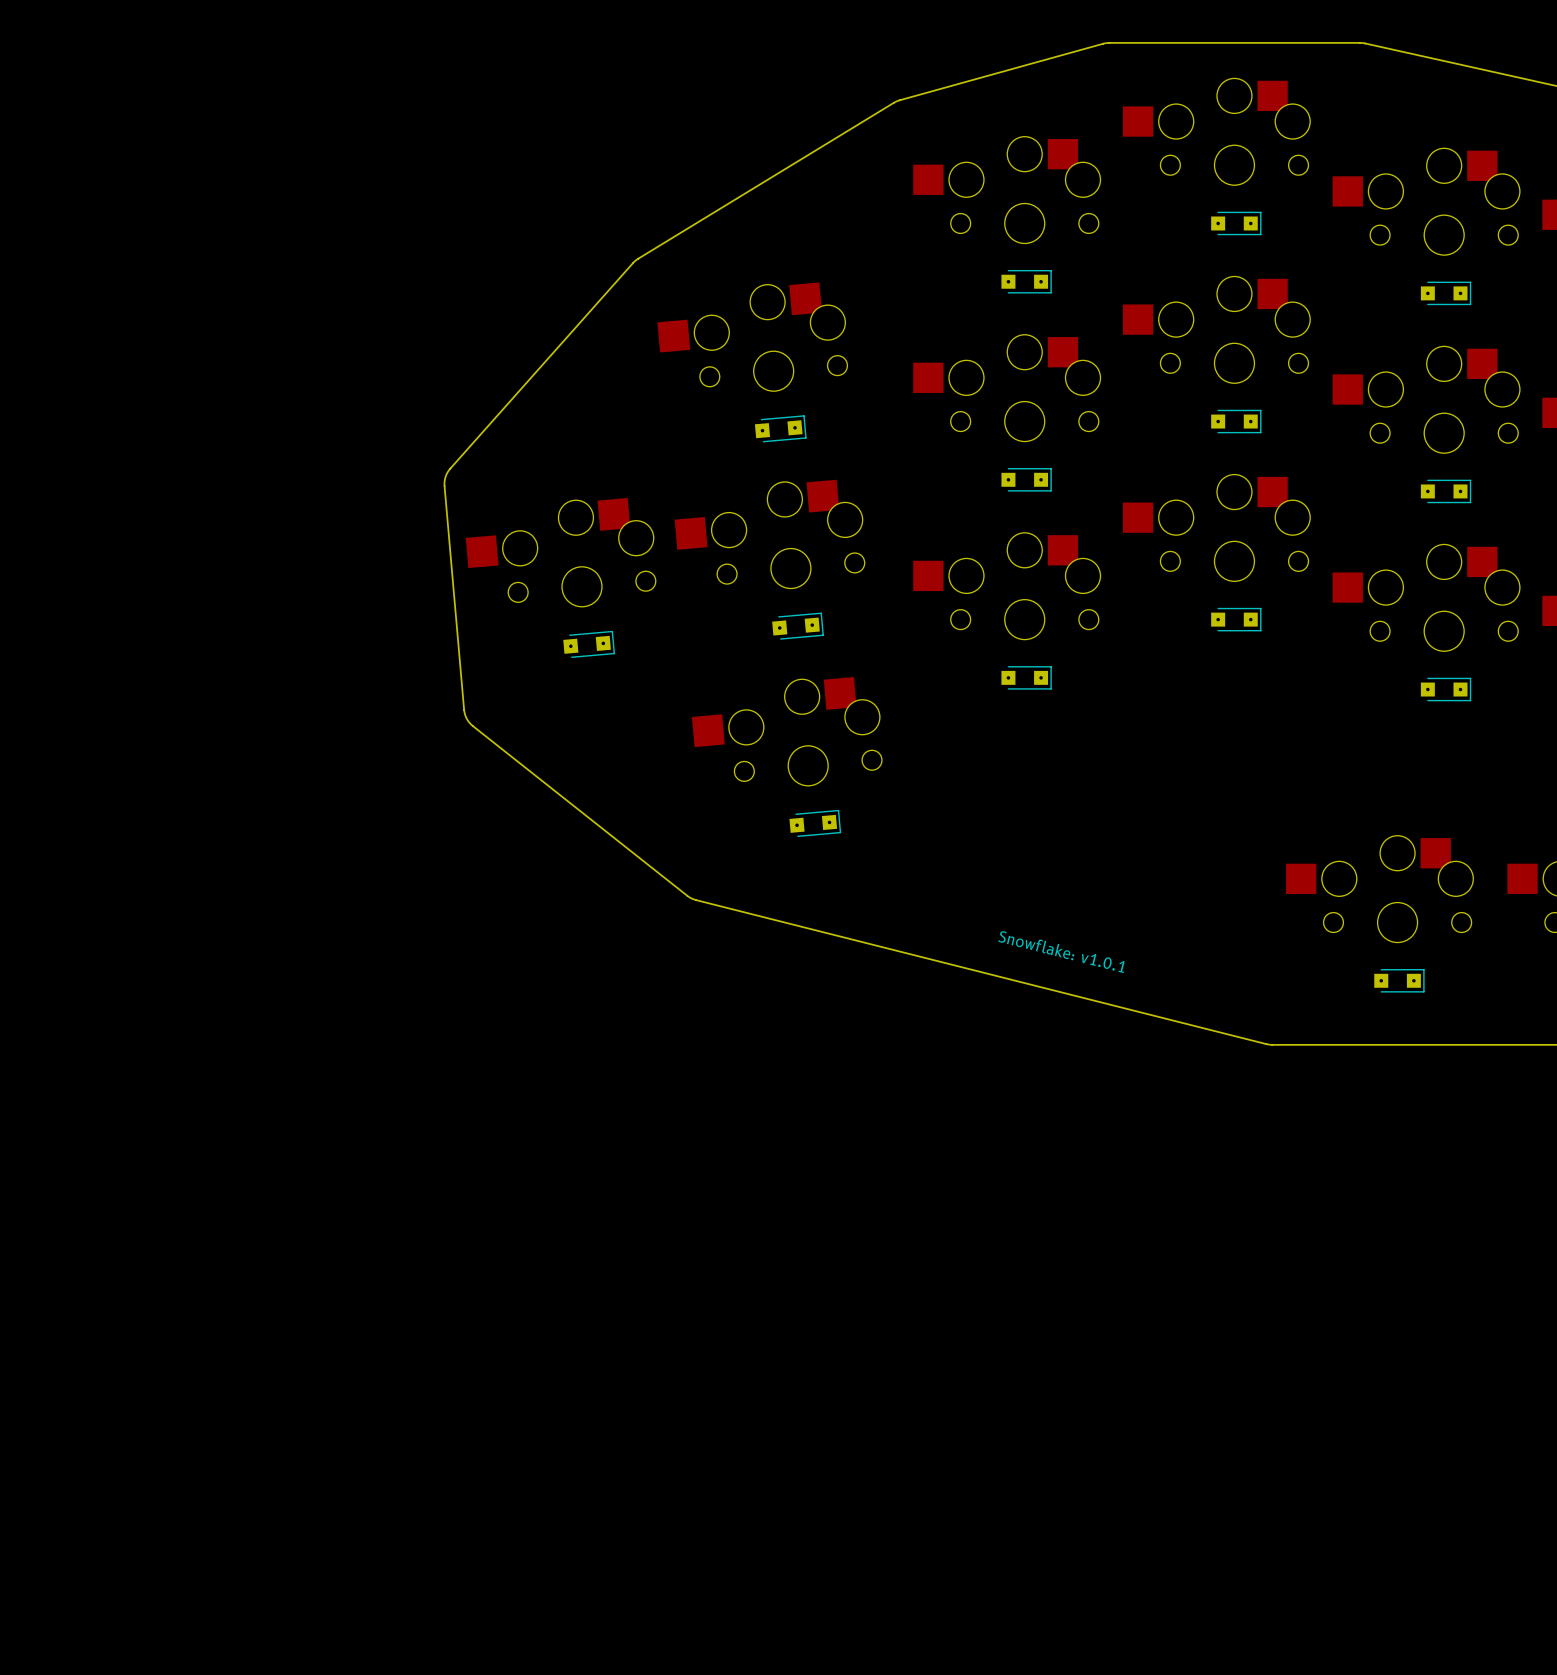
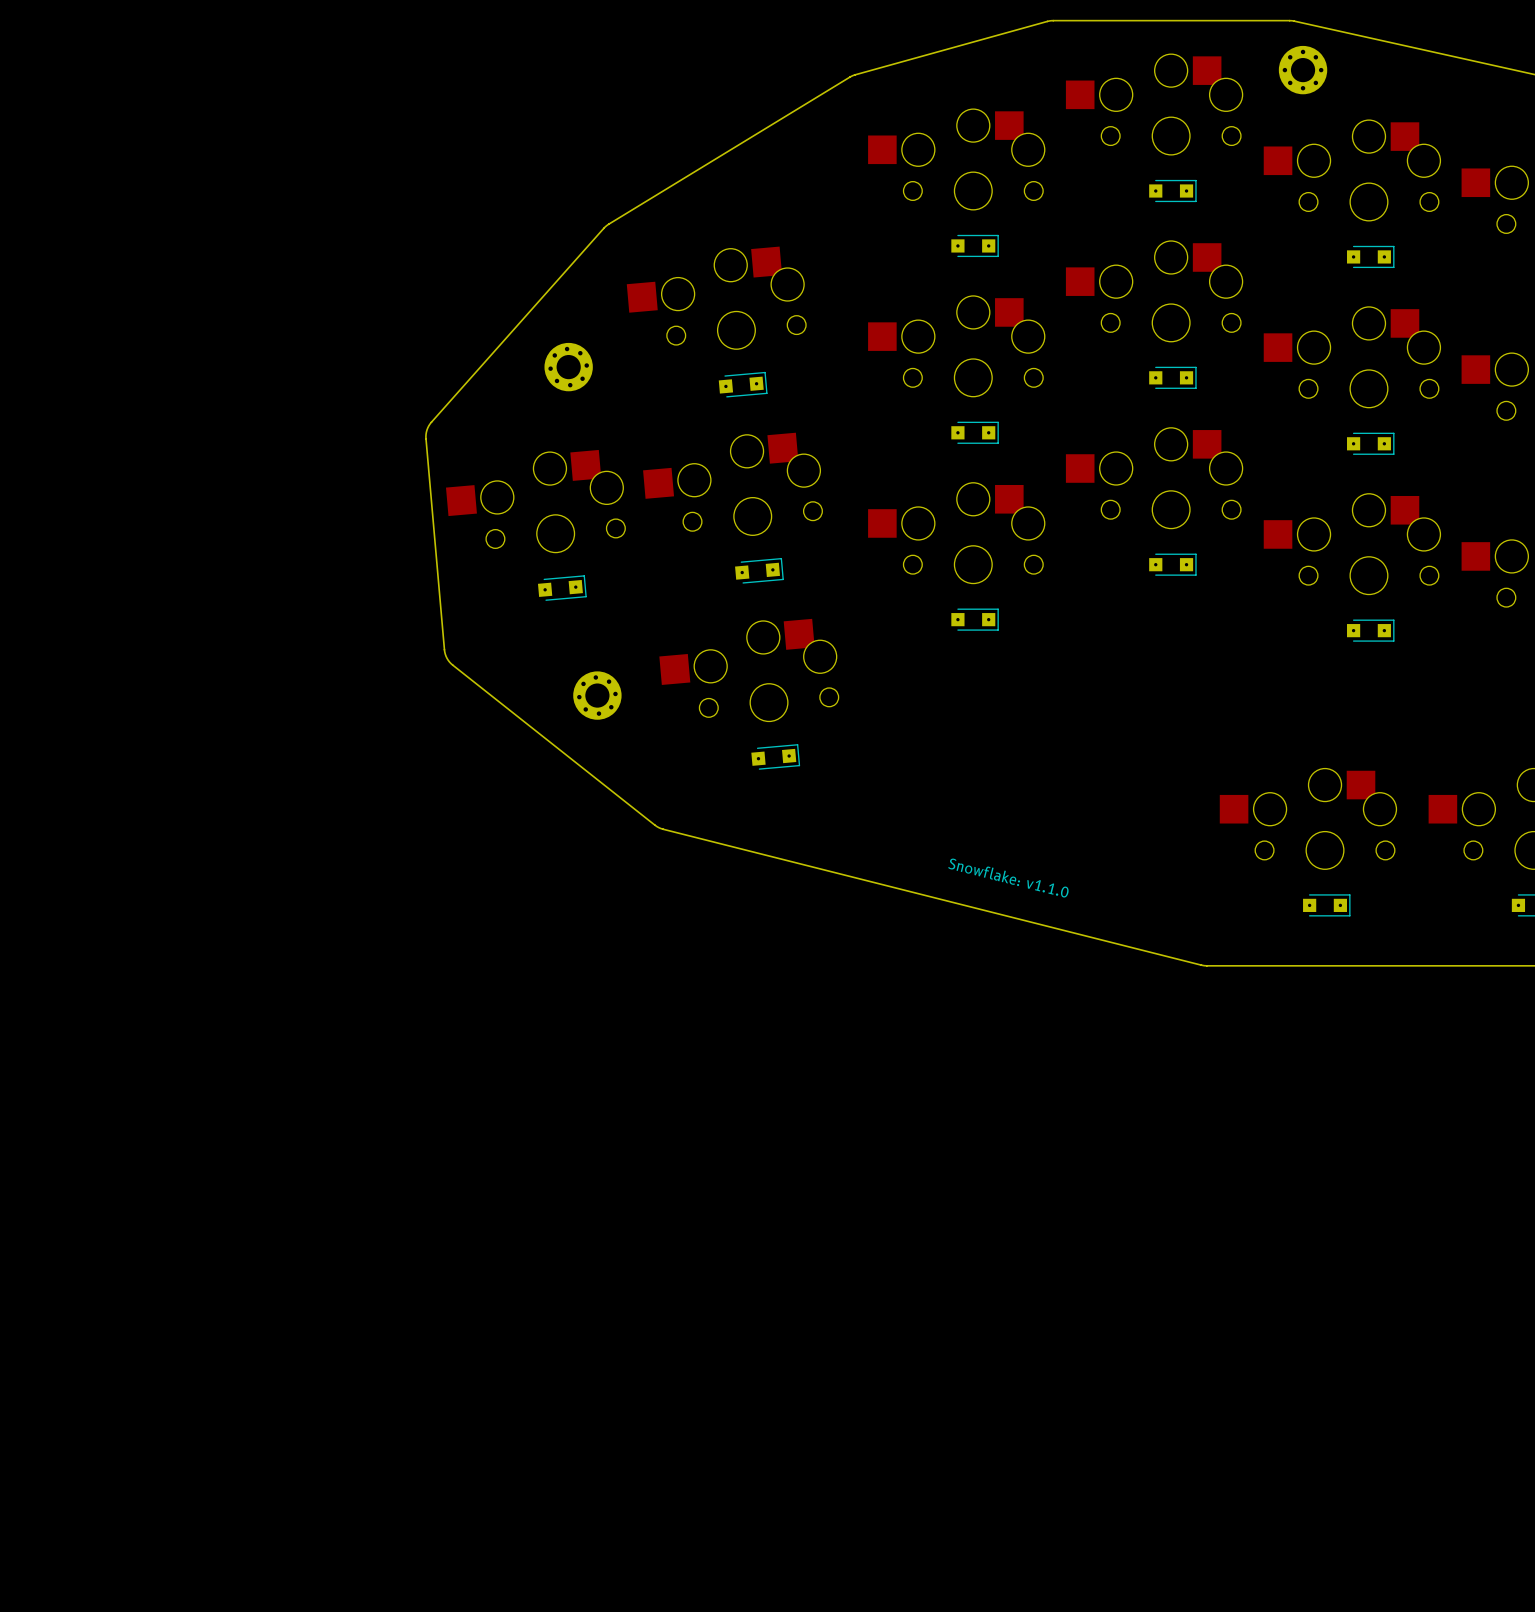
part: none -> (1303, 70)
part: none -> (568, 367)
part: none -> (597, 695)
text: Snowflake: v1.0.1 (1061, 952) -> Snowflake: v1.1.0 (1008, 878)

